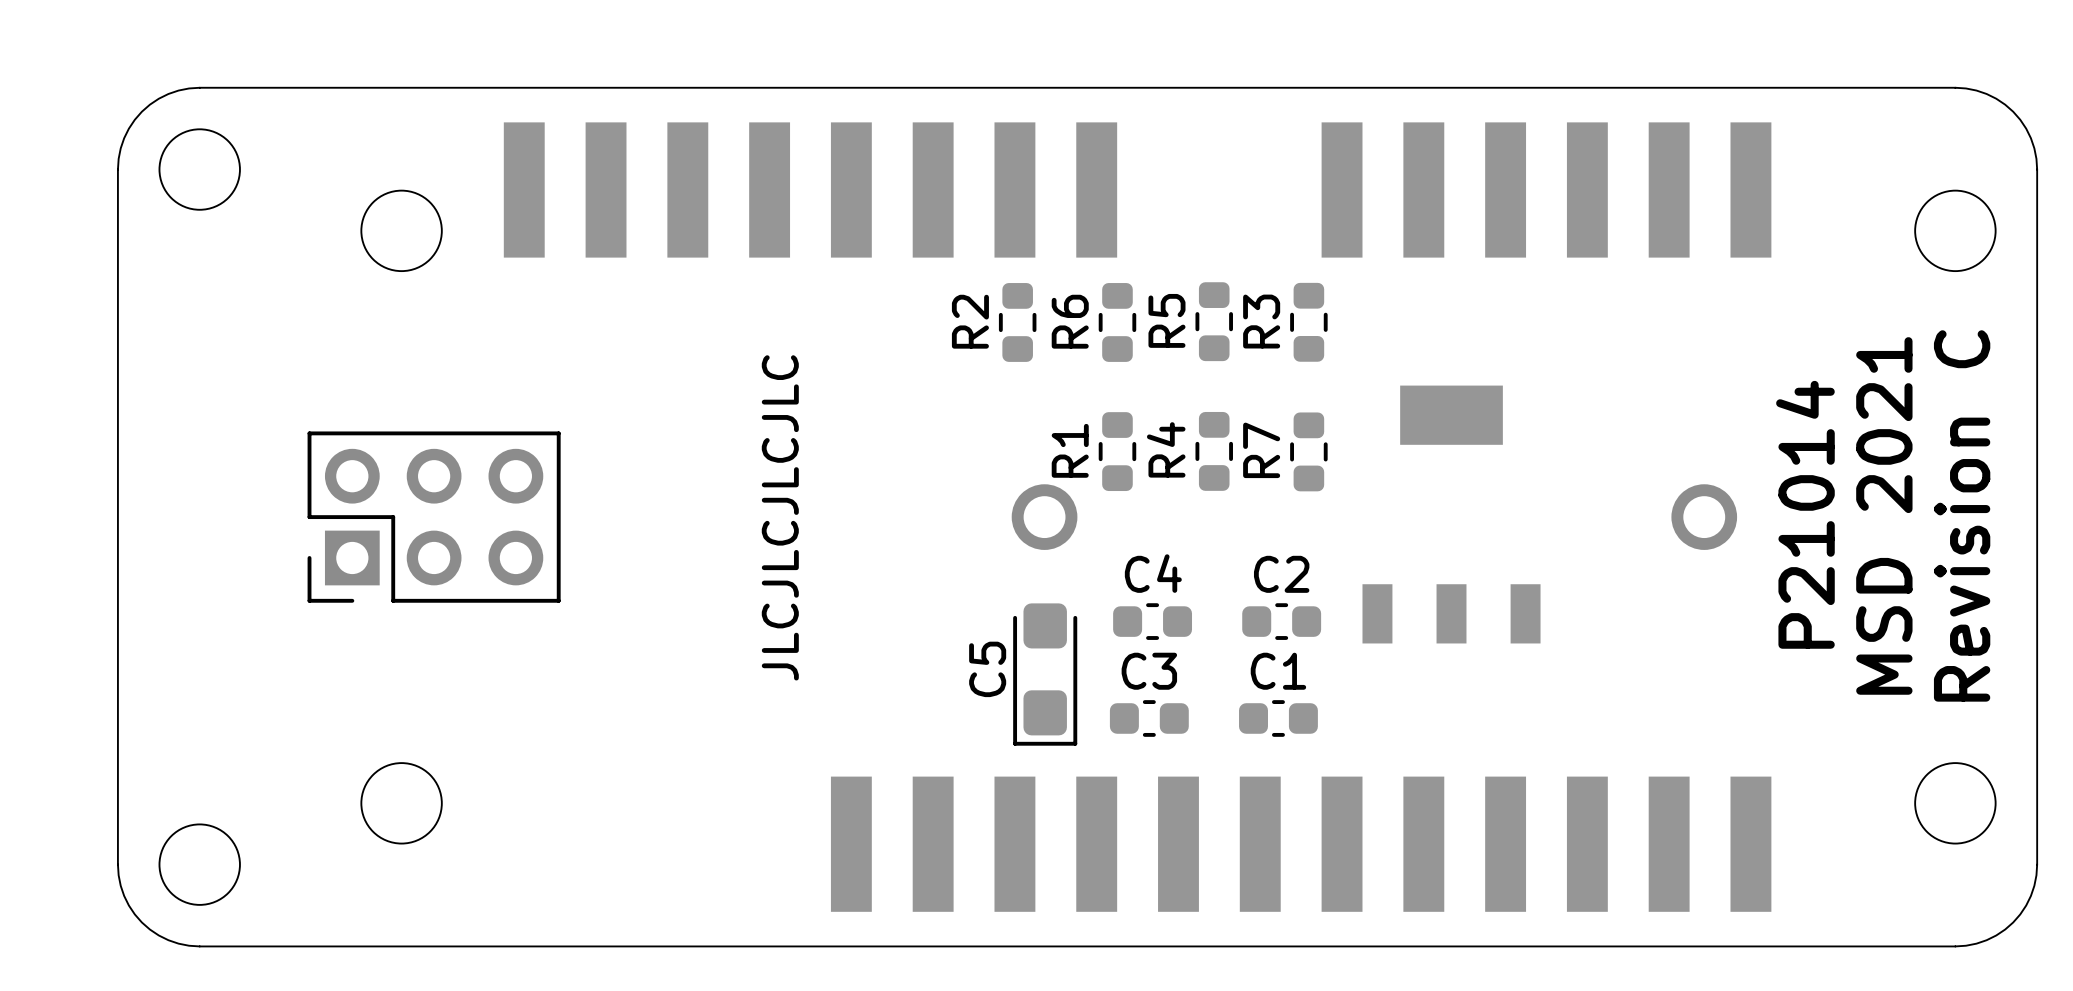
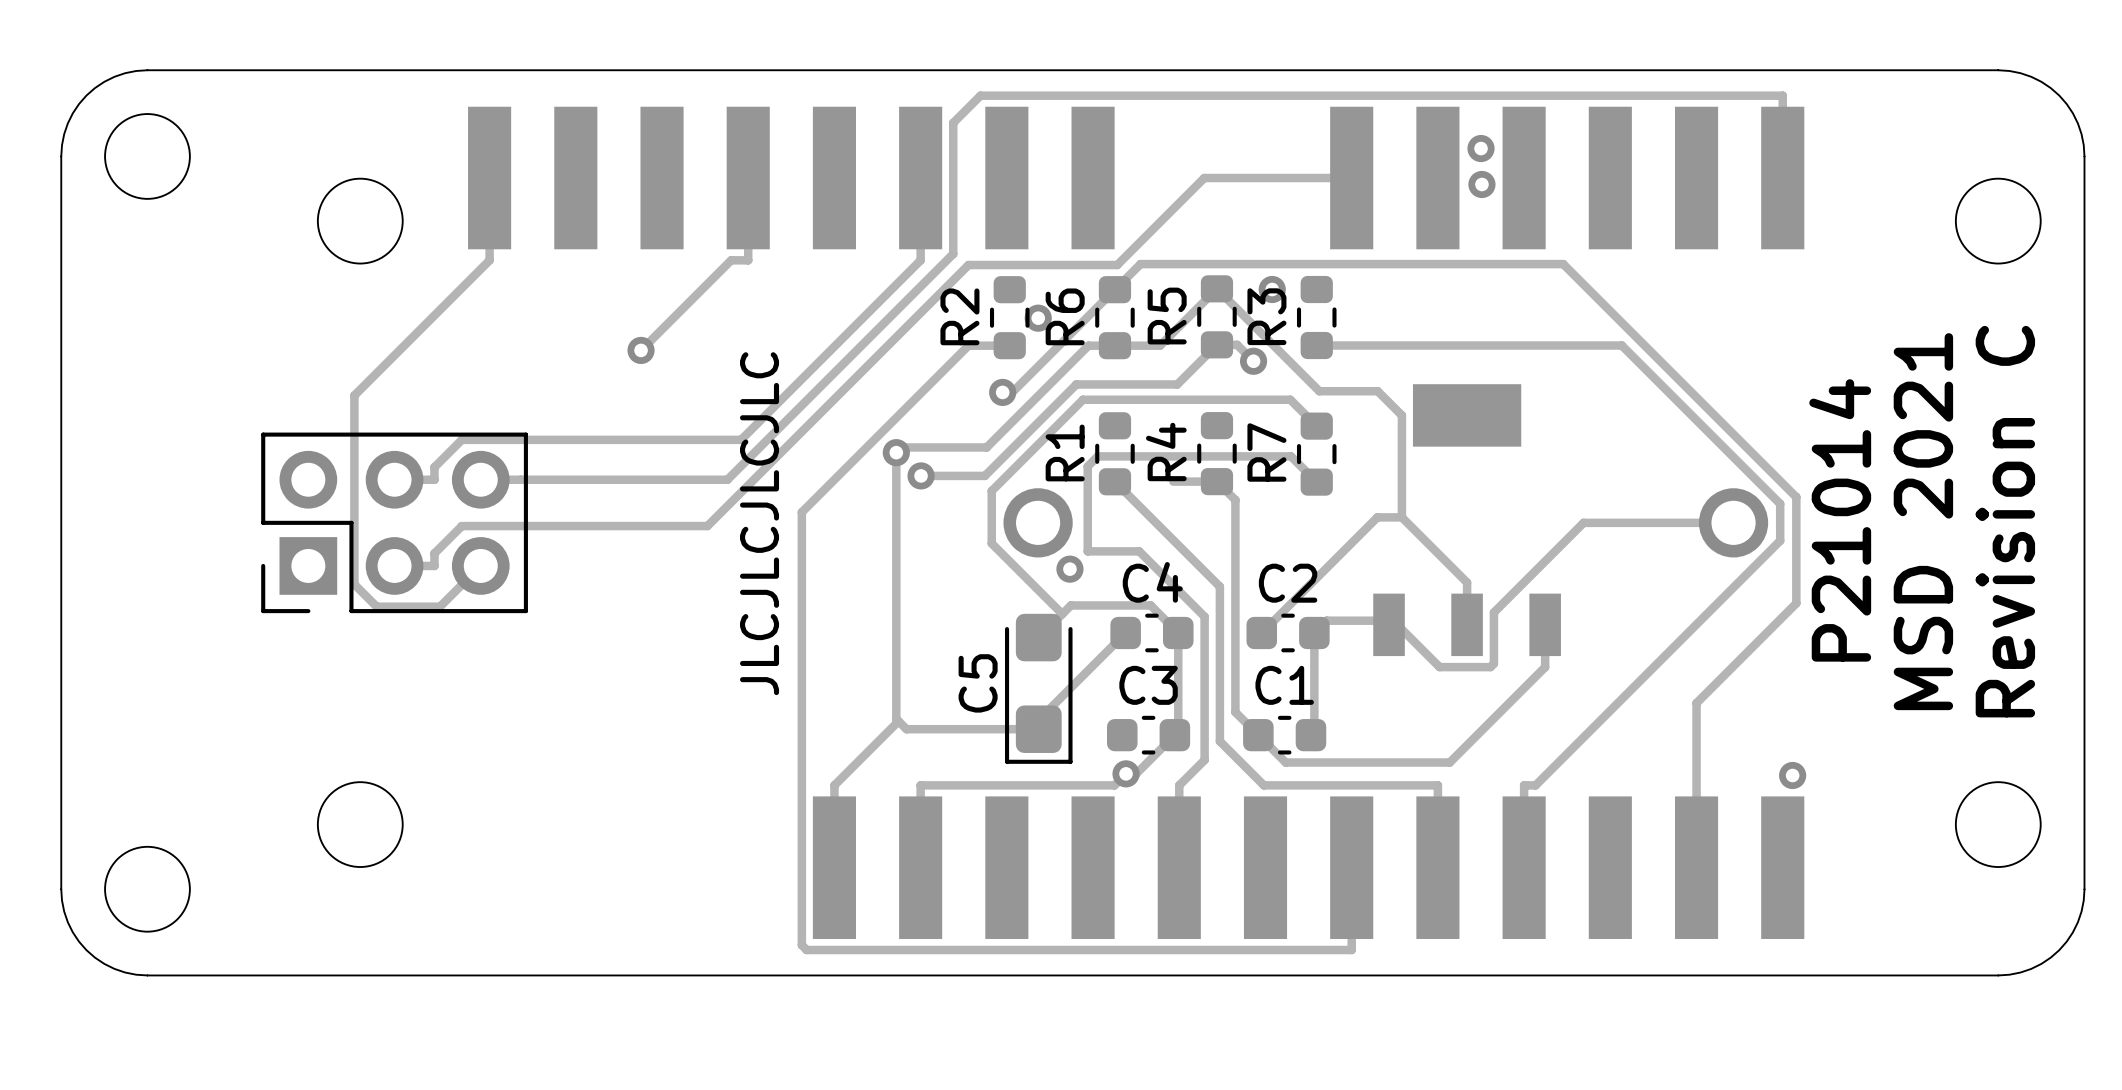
via: none -> (1481, 148)
track: none -> (489, 178) (489, 260) (354, 395) (354, 584) (376, 606) (440, 606) (480, 565)
track: none -> (748, 178) (748, 260) (731, 260) (641, 350)
track: none -> (920, 178) (920, 260) (741, 439) (461, 439) (434, 467) (434, 479) (394, 479)
track: none -> (1351, 178) (1204, 178) (1117, 265) (968, 265) (707, 526) (461, 526) (434, 553) (434, 565) (394, 565)
track: none -> (1782, 178) (1782, 95) (980, 95) (953, 122) (953, 253) (727, 479) (480, 479)
via: none -> (1481, 184)
via: none -> (1272, 289)
via: none -> (1038, 318)
track: none -> (1316, 345) (1621, 345) (1780, 503) (1780, 540) (1535, 785) (1524, 785) (1524, 867)
track: none -> (1009, 345) (968, 345) (801, 512) (801, 945) (806, 950) (1351, 950) (1351, 867)
via: none -> (641, 350)
track: none -> (1253, 361) (1237, 344) (1216, 344) (1177, 384) (1076, 384) (984, 475) (921, 475)
via: none -> (1253, 361)
track: none -> (1002, 392) (1012, 392) (1140, 264) (1563, 264) (1796, 497) (1796, 603) (1696, 703) (1696, 867)
via: none -> (1002, 392)
track: none -> (1316, 426) (1290, 399) (1083, 399) (991, 491) (991, 543) (1062, 614)
via: none -> (896, 452)
via: none -> (921, 475)
track: none -> (1173, 481) (1216, 481) (1235, 500) (1235, 712) (1285, 762) (1449, 762) (1545, 667) (1545, 624)
track: none -> (1114, 481) (1219, 586) (1219, 741) (1263, 785) (1437, 785) (1437, 867)
track: none -> (1316, 482) (1291, 456) (1097, 456) (1087, 466) (1087, 551) (1139, 551) (1204, 616) (1204, 760) (1179, 785) (1179, 867)
track: none -> (1401, 517) (1467, 582) (1467, 624)
track: none -> (1401, 517) (1377, 517) (1261, 632)
track: none -> (1401, 517) (1401, 415) (1377, 391) (1319, 391) (1216, 288) (1160, 345) (1088, 345) (986, 447) (901, 447) (896, 452) (896, 718) (906, 729) (1038, 729) (1038, 719) (1125, 632)
track: none -> (1733, 522) (1583, 522) (1493, 612) (1493, 663) (1490, 667) (1439, 667) (1389, 616) (1389, 624)
via: none -> (1069, 569)
track: none -> (1389, 620) (1326, 620) (1314, 632) (1314, 731) (1310, 735)
track: none -> (1038, 637) (1070, 605) (1150, 605) (1178, 632) (1178, 731) (1136, 773) (1126, 773) (1114, 785) (920, 785) (920, 867)
track: none -> (898, 721) (834, 785) (834, 867)
via: none -> (1126, 773)
via: none -> (1792, 775)

